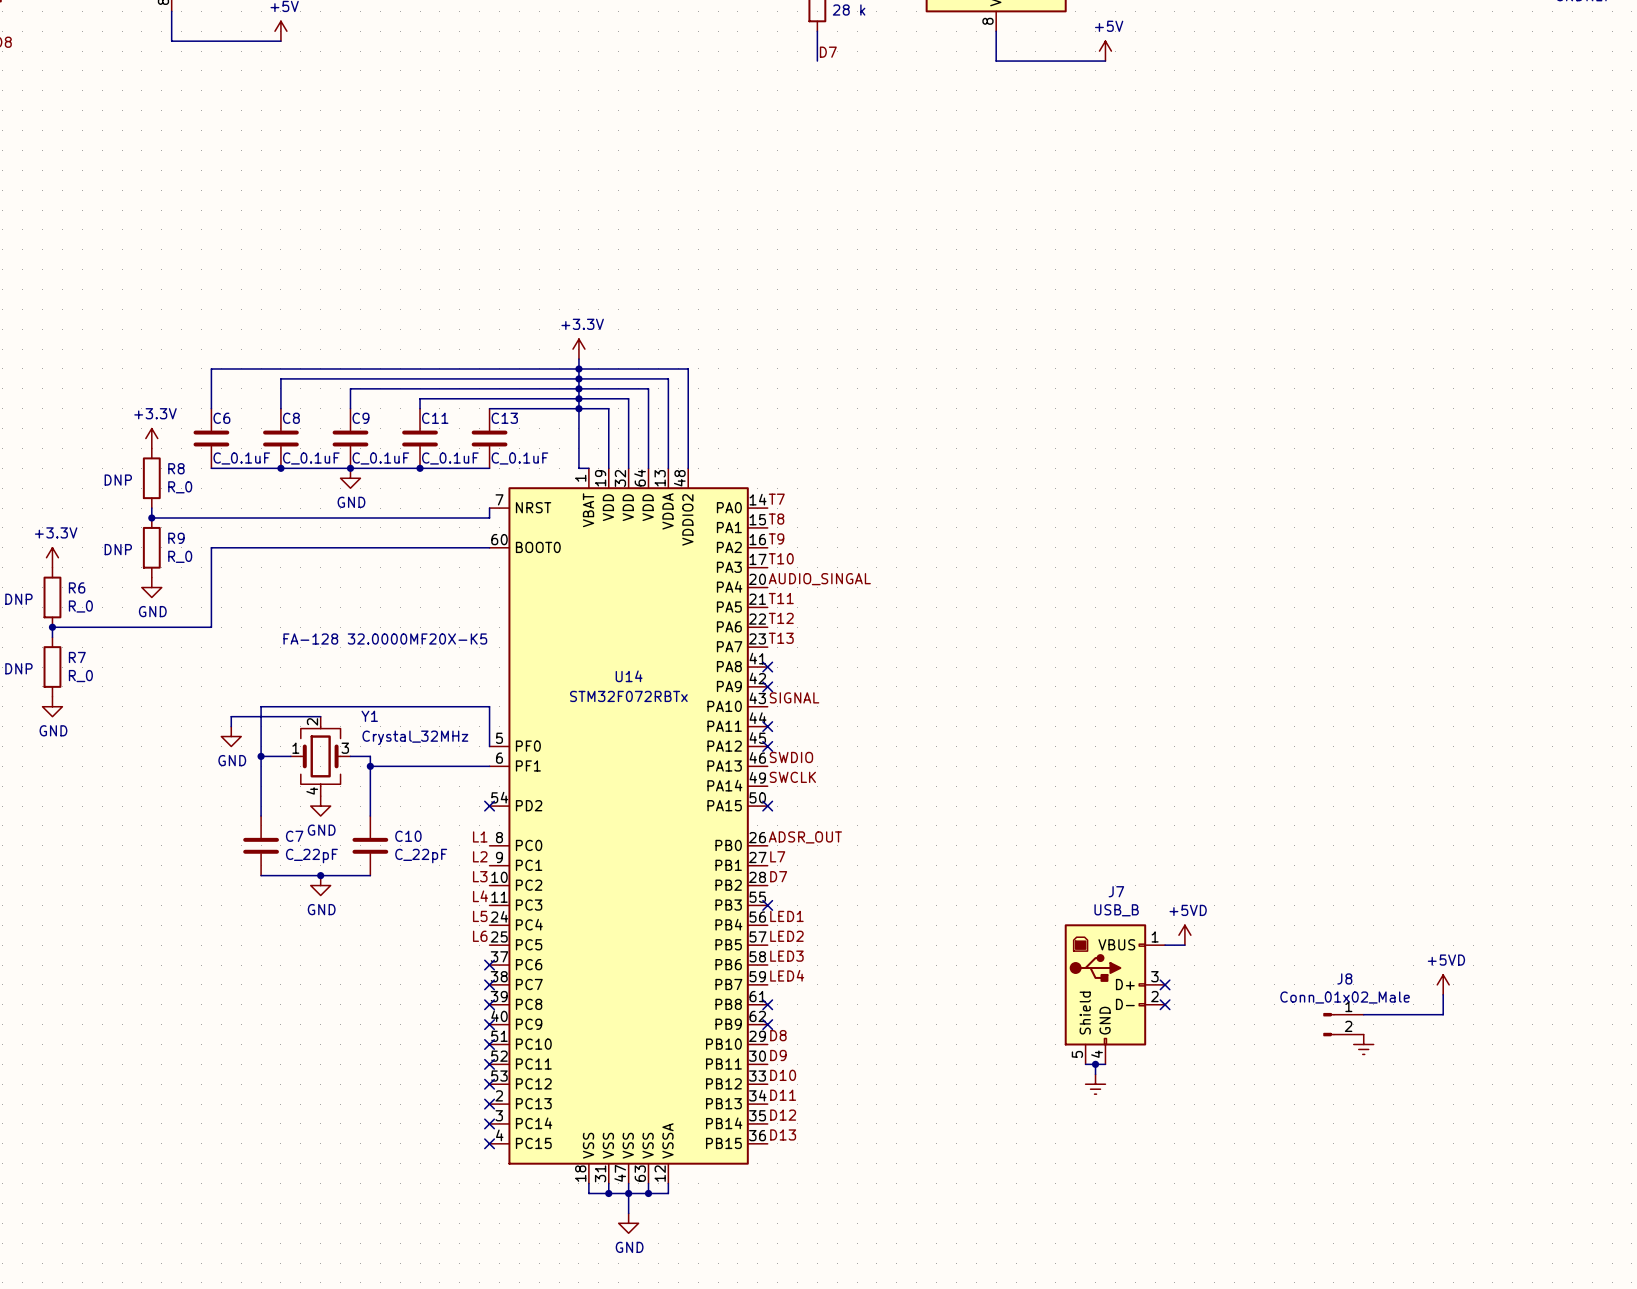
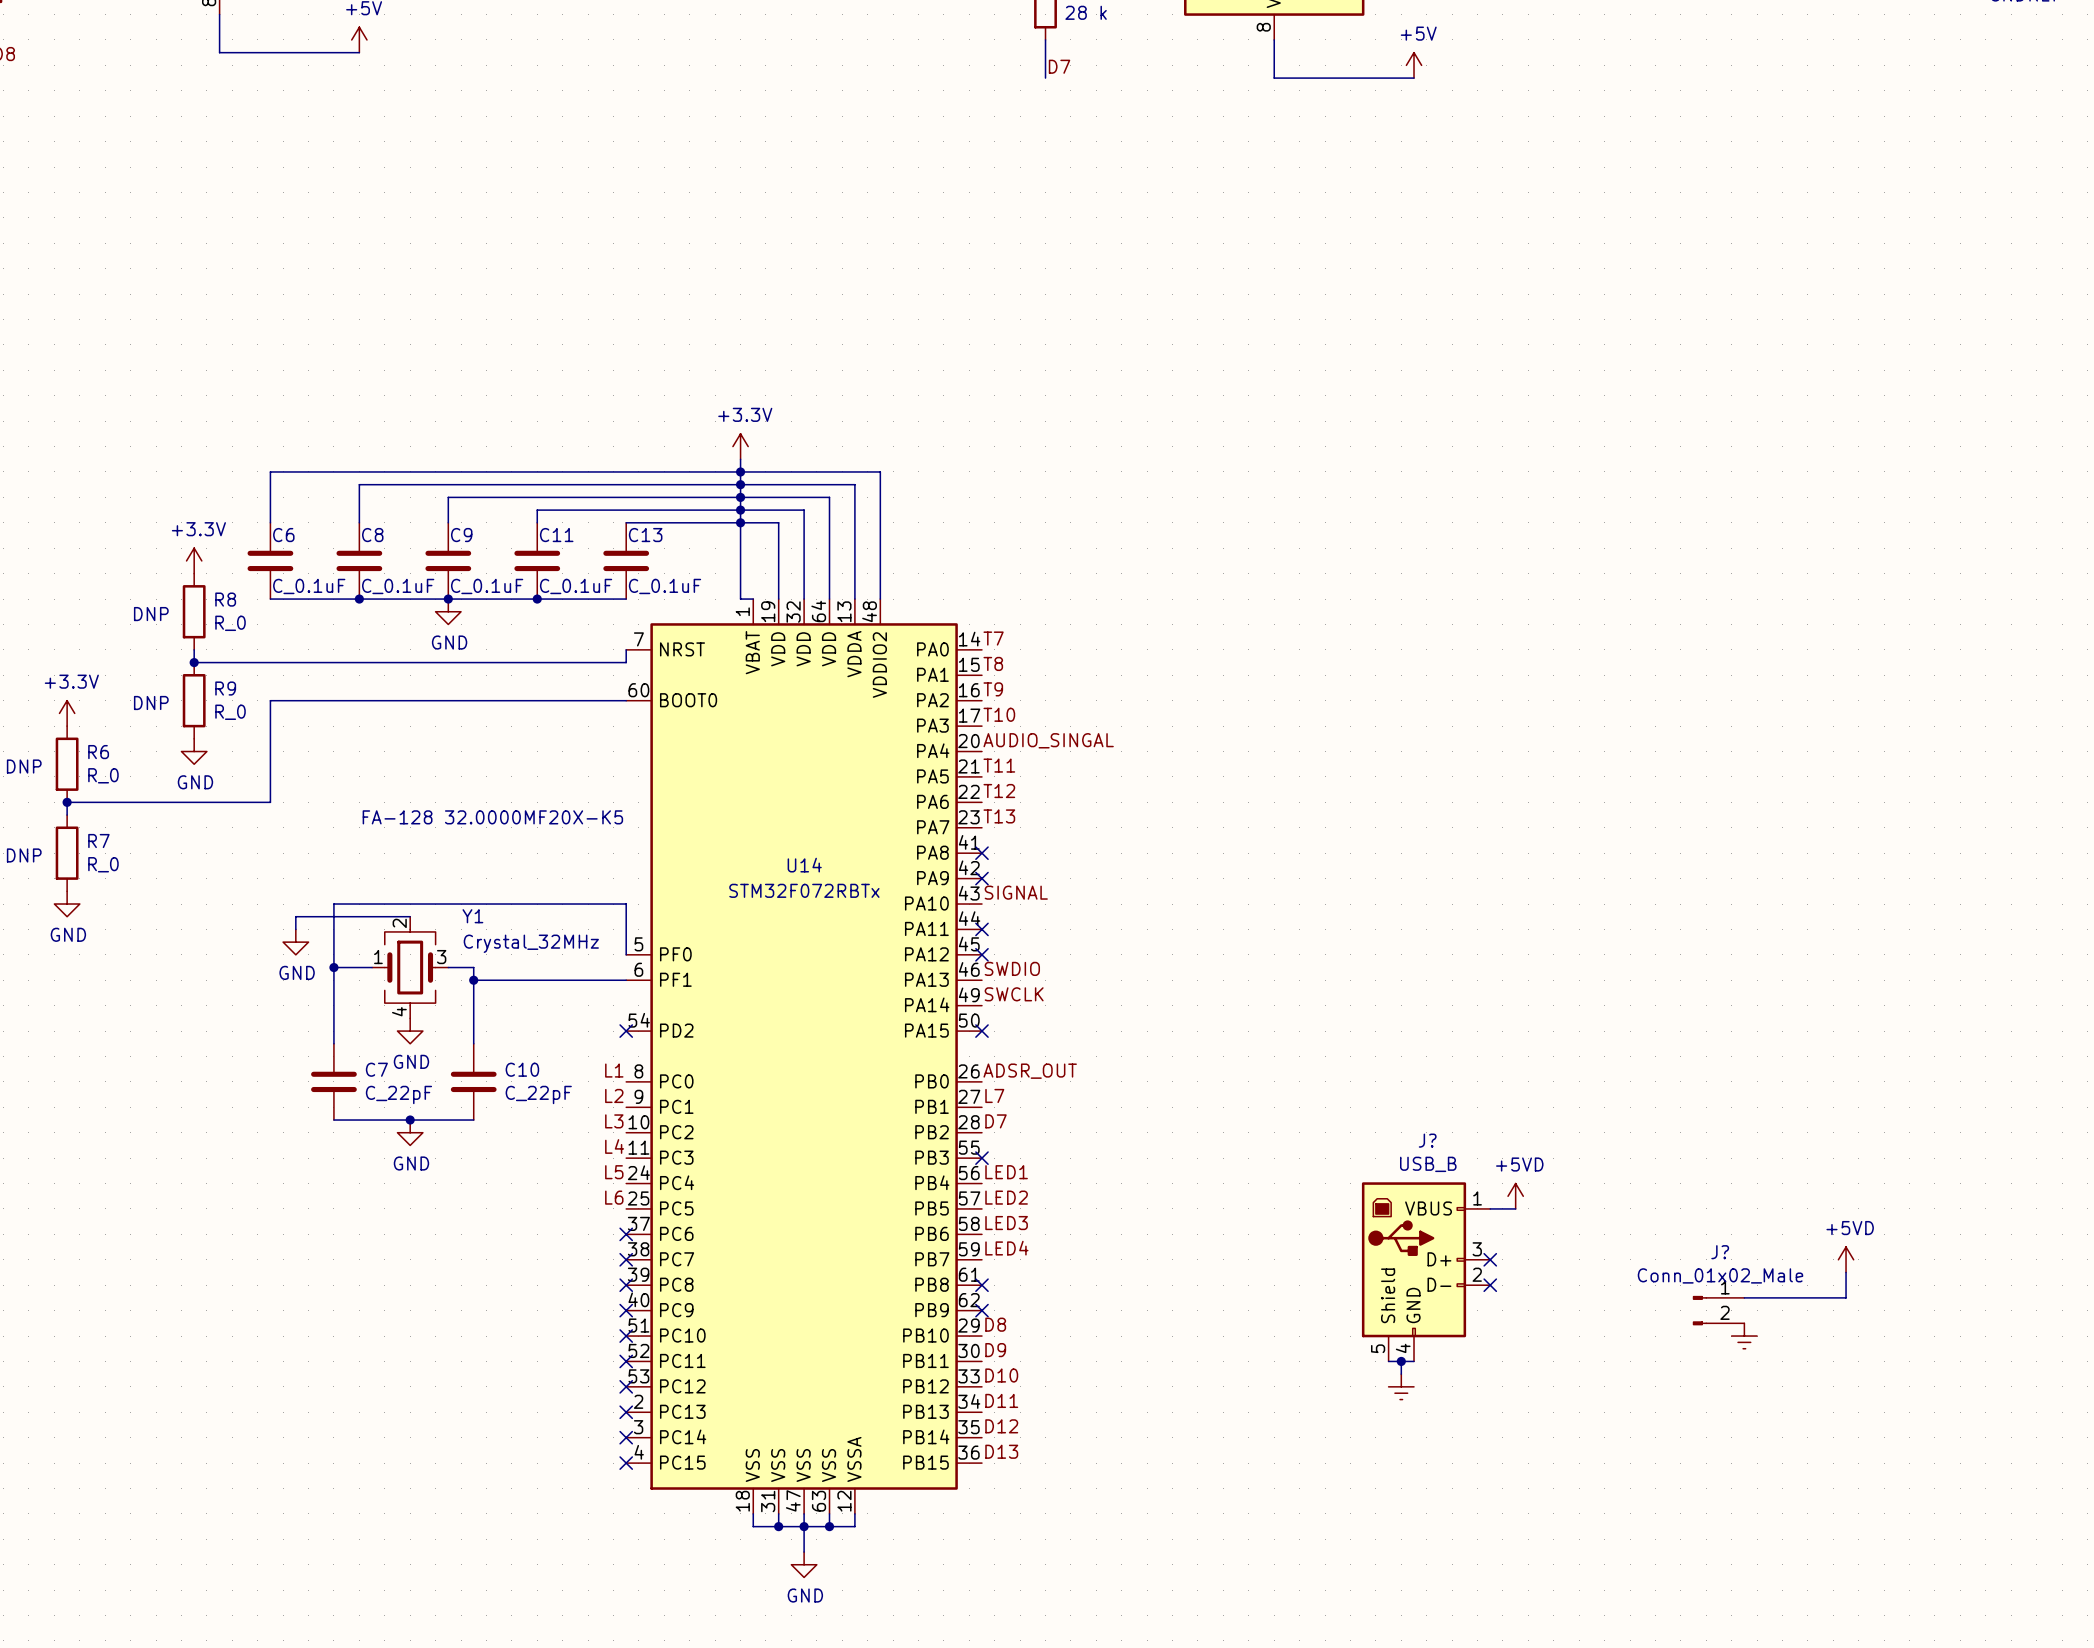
J7 name: J7 (1116, 891) -> J? (1427, 1140)
J8 name: J8 (1344, 978) -> J? (1720, 1252)

